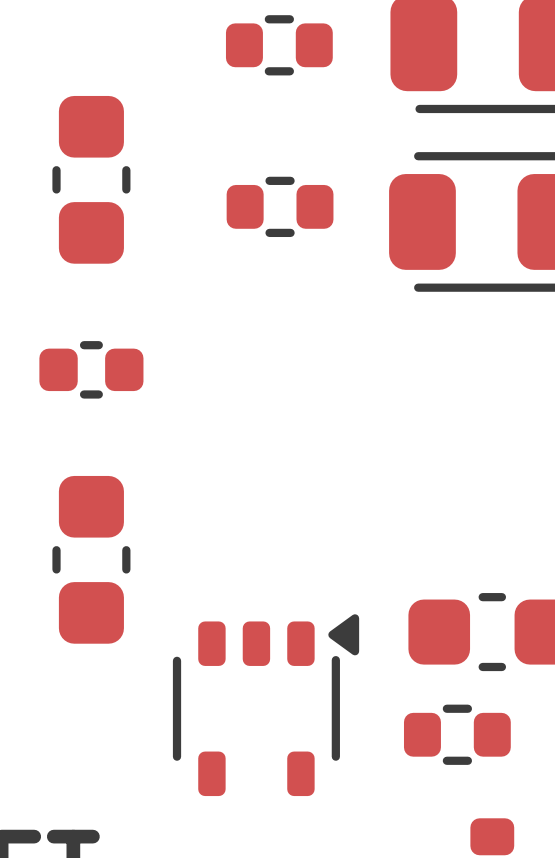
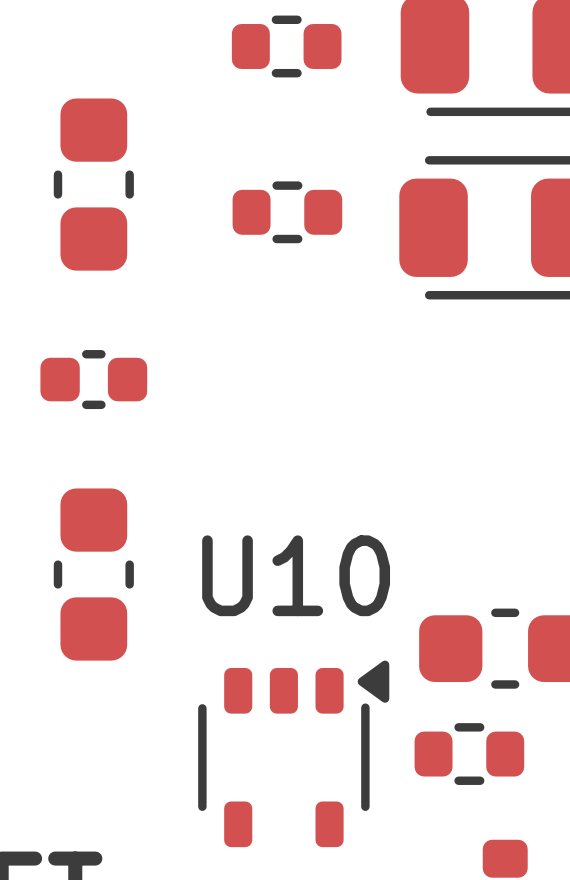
U10 name: none -> U10 (296, 575)
U10 position: (266, 705) -> (293, 753)

